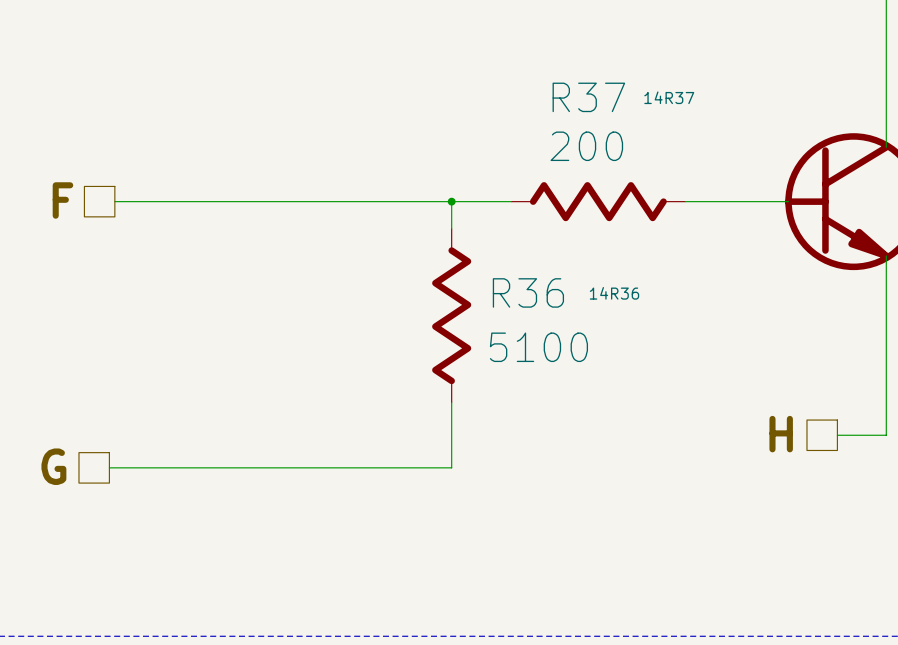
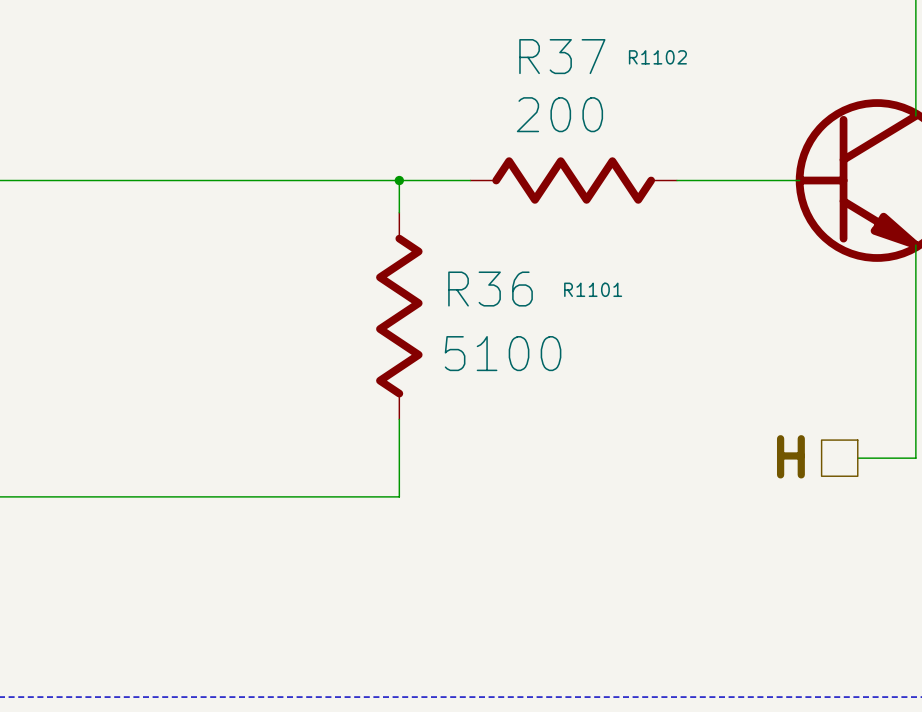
14R37 name: 14R37 (669, 97) -> R1102 (657, 57)
14R36 name: 14R36 (614, 293) -> R1101 (593, 289)

